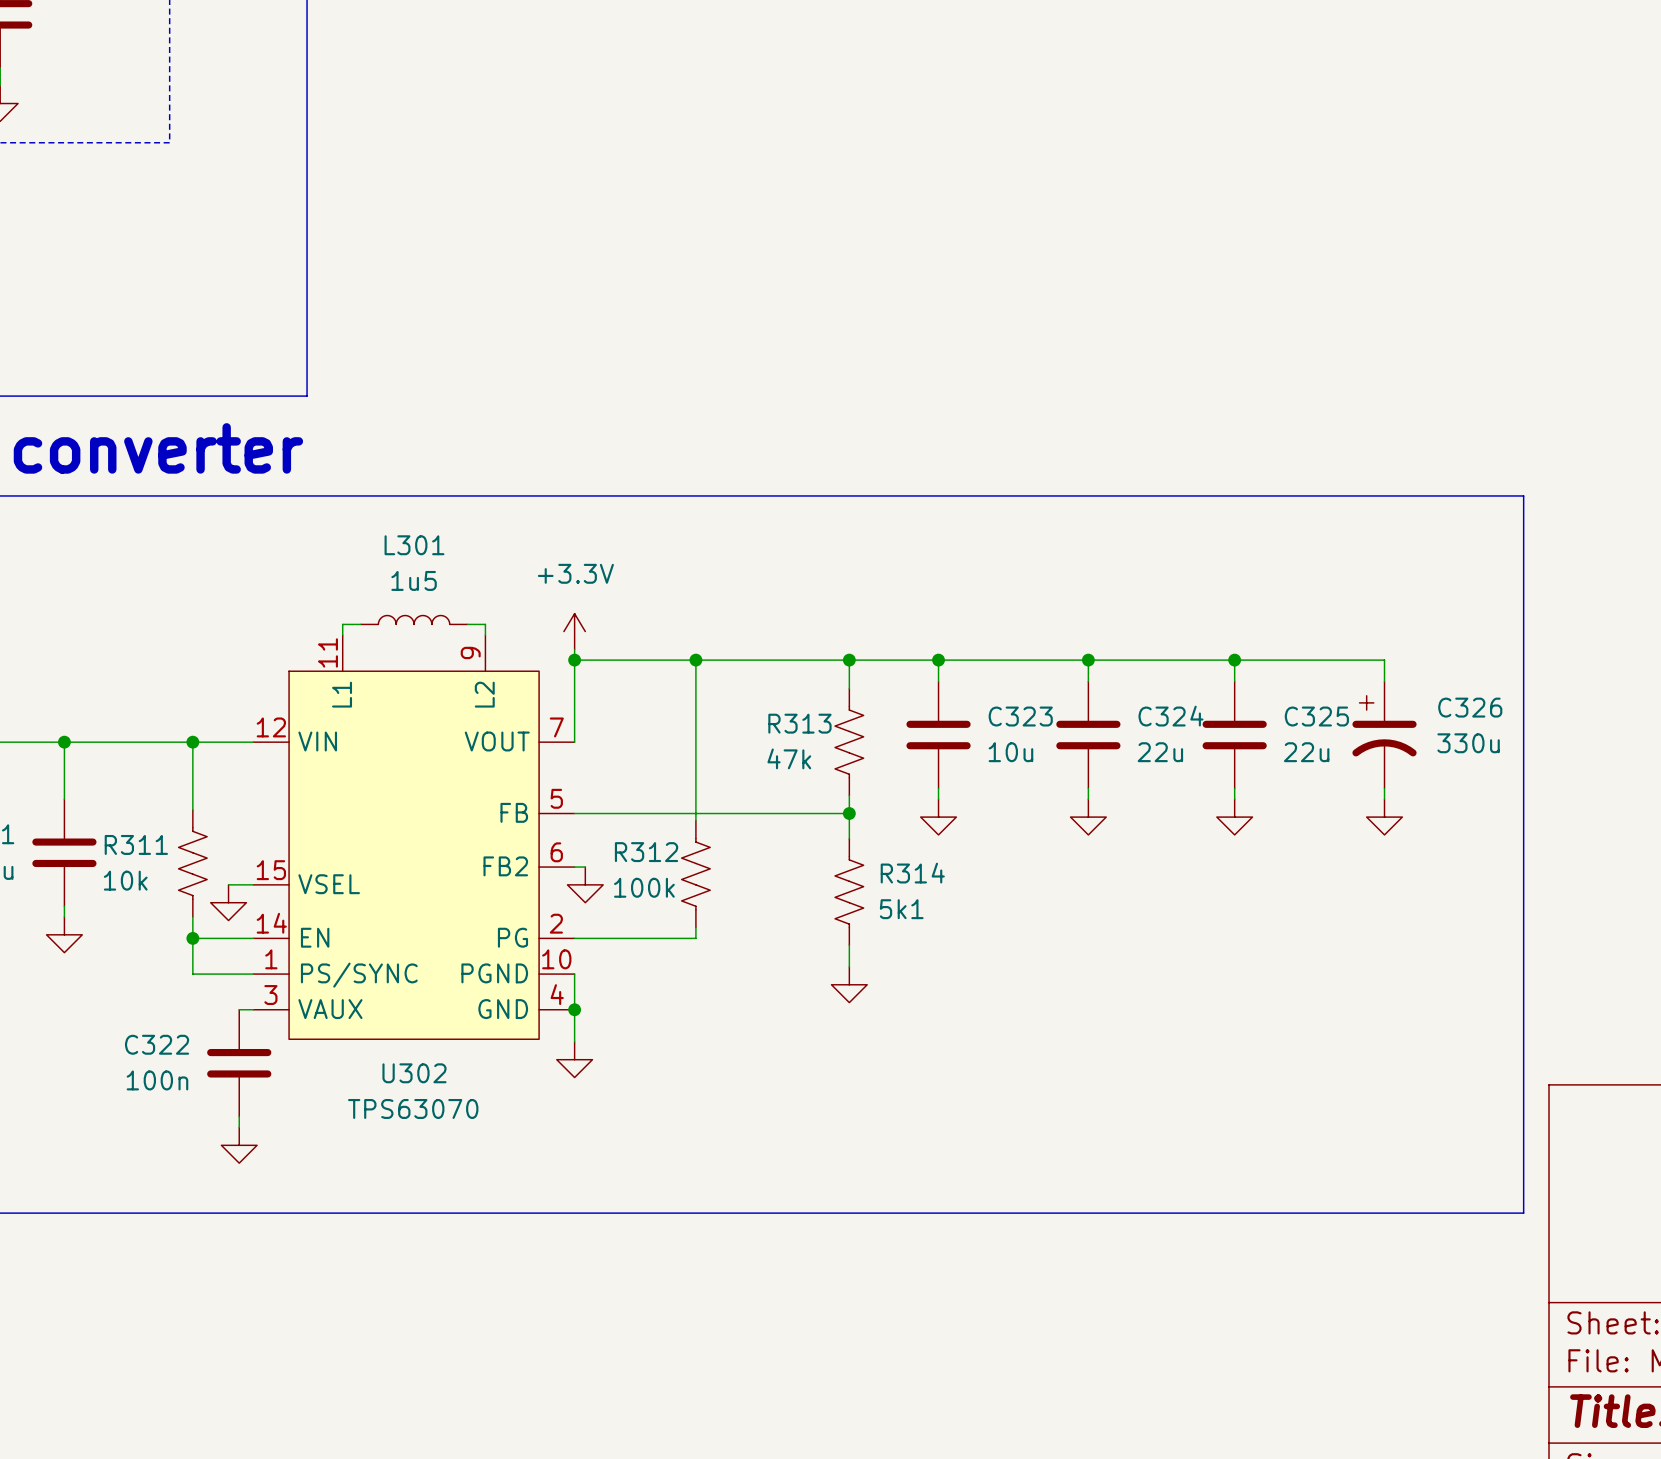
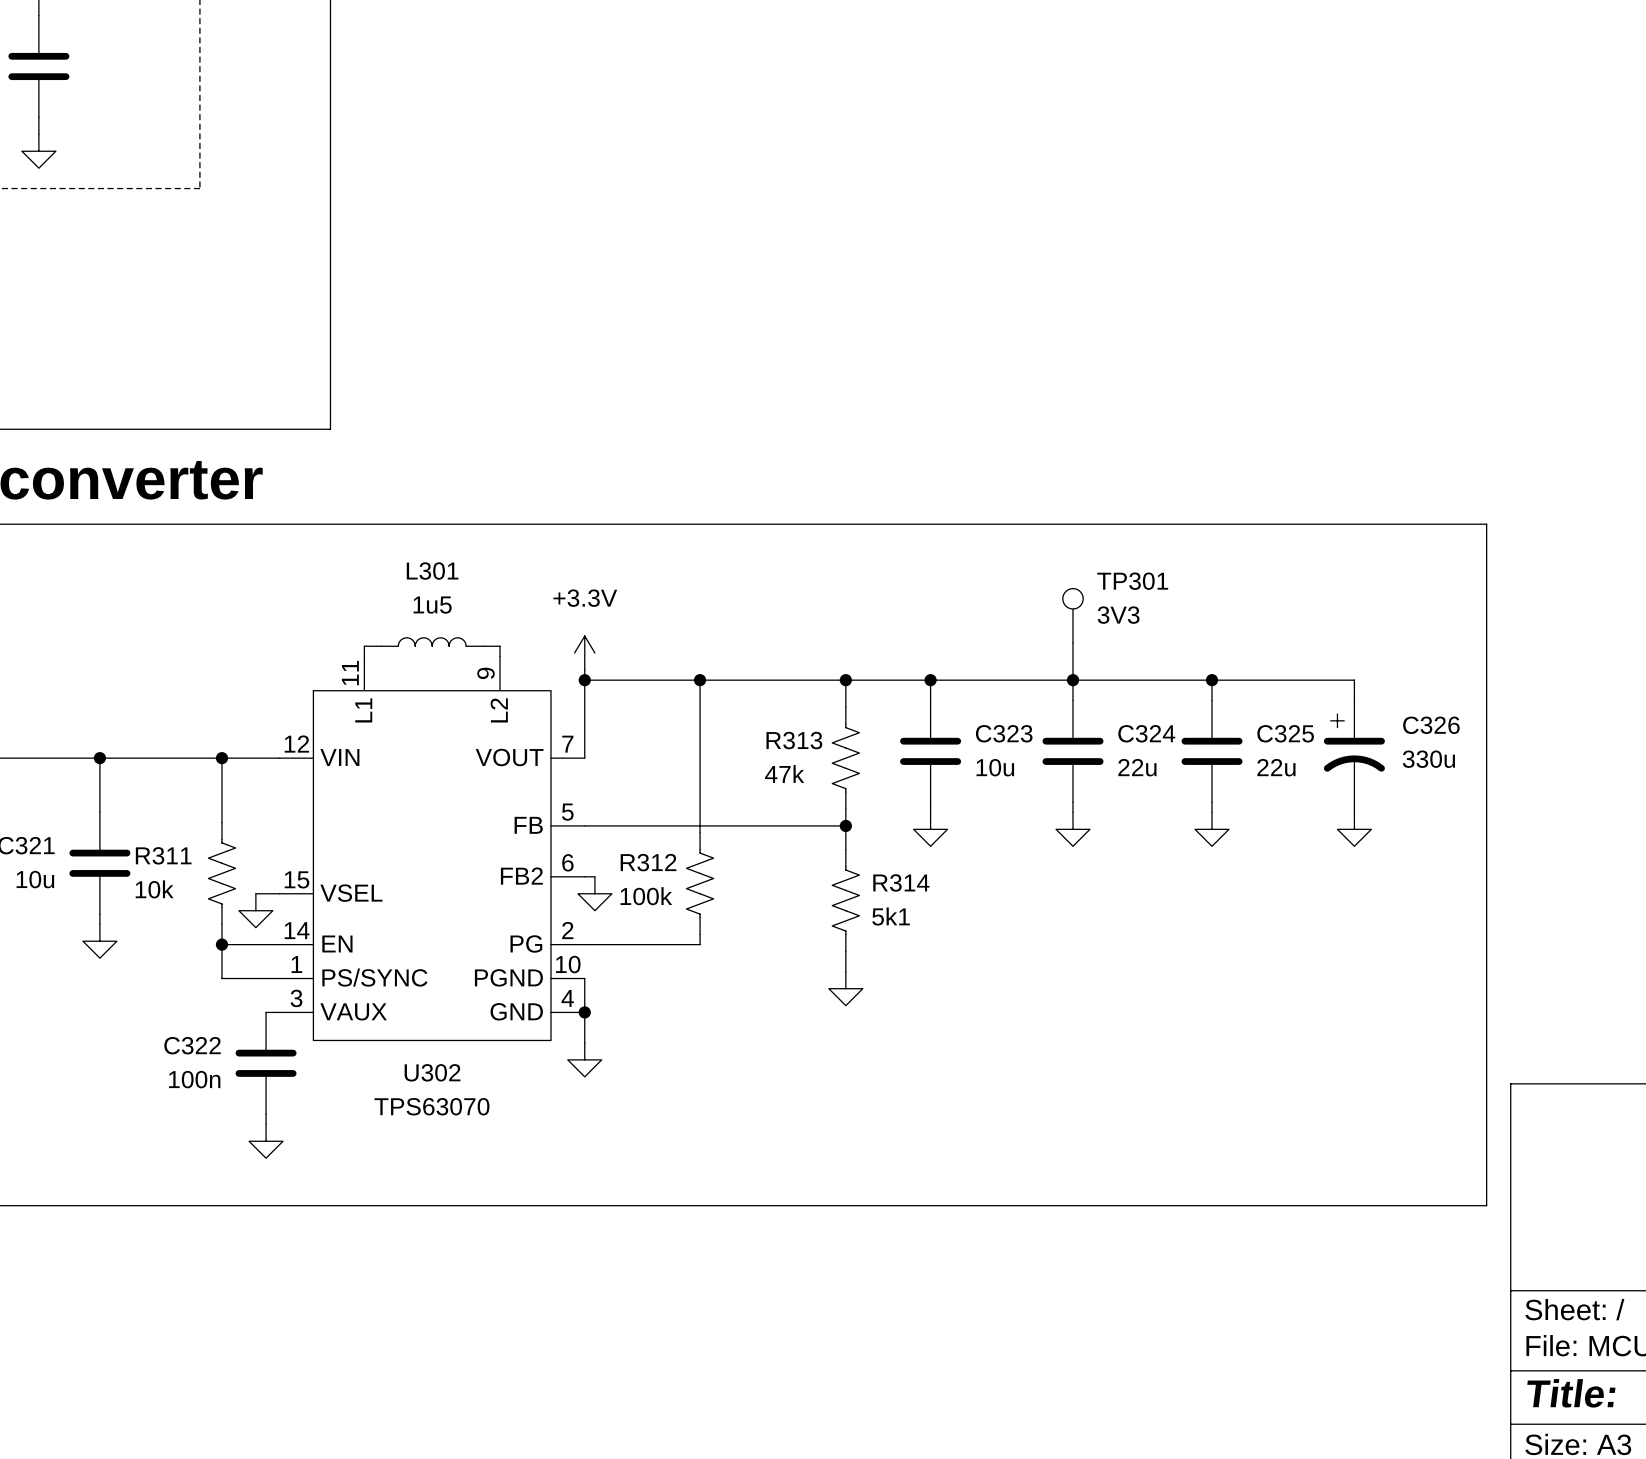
TP301: none -> 3V3 (1073, 615)
wire: none -> (1073, 642) (1073, 680)

